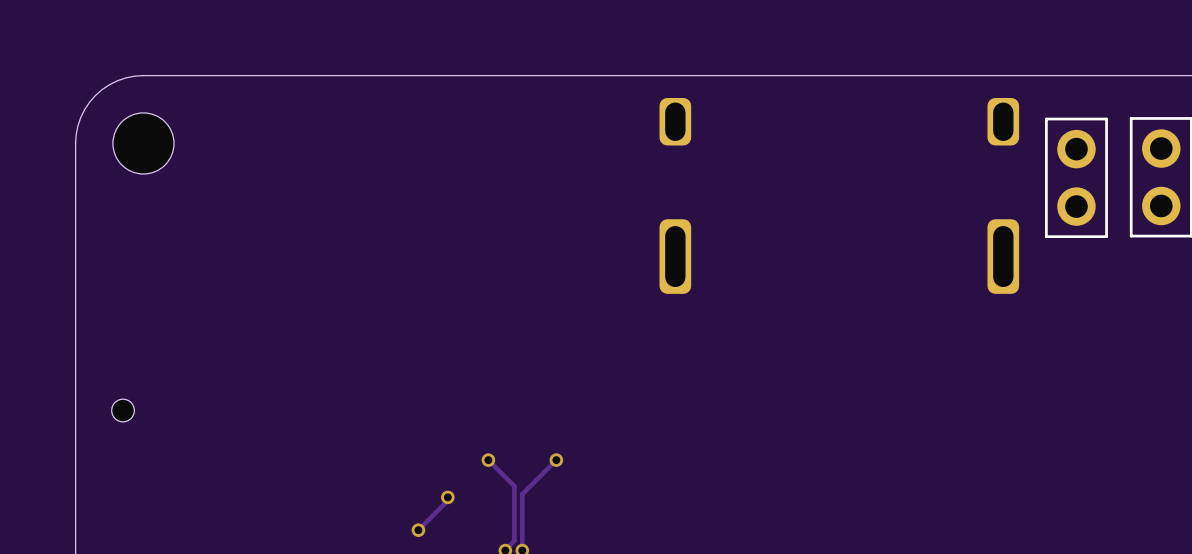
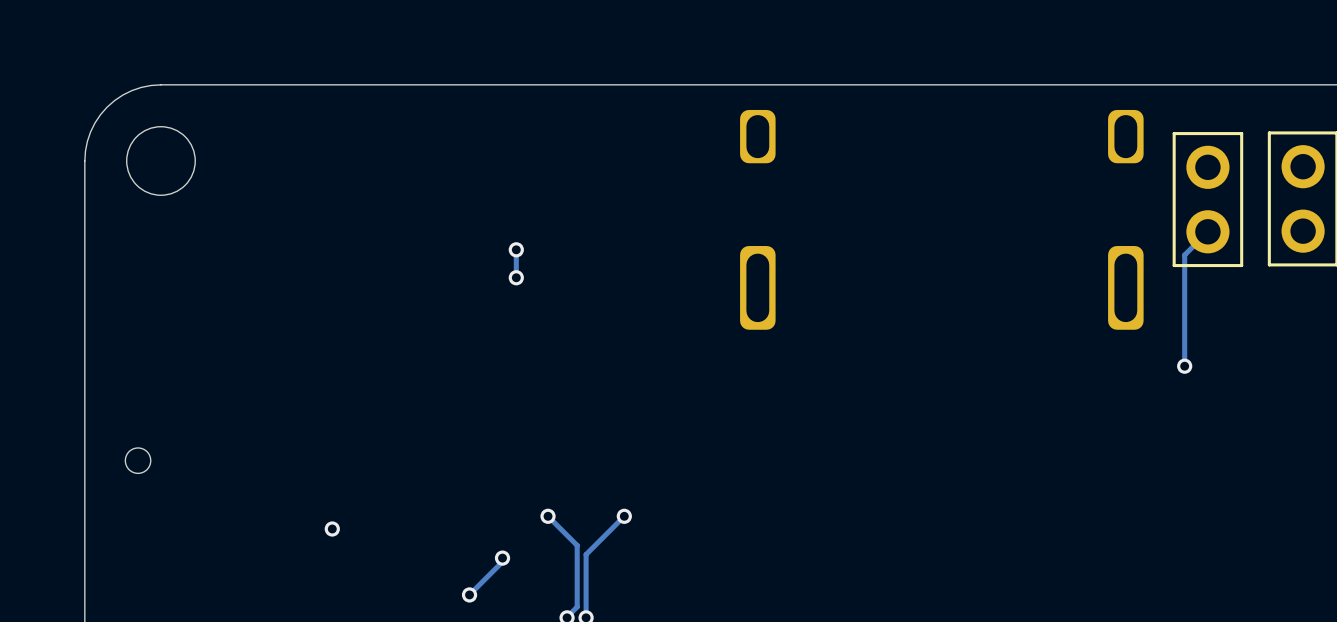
track: none -> (1207, 231) (1184, 255) (1184, 366)
track: none -> (516, 249) (516, 275)
via: none -> (516, 249)
via: none -> (516, 277)
via: none -> (1184, 366)
via: none -> (332, 529)

